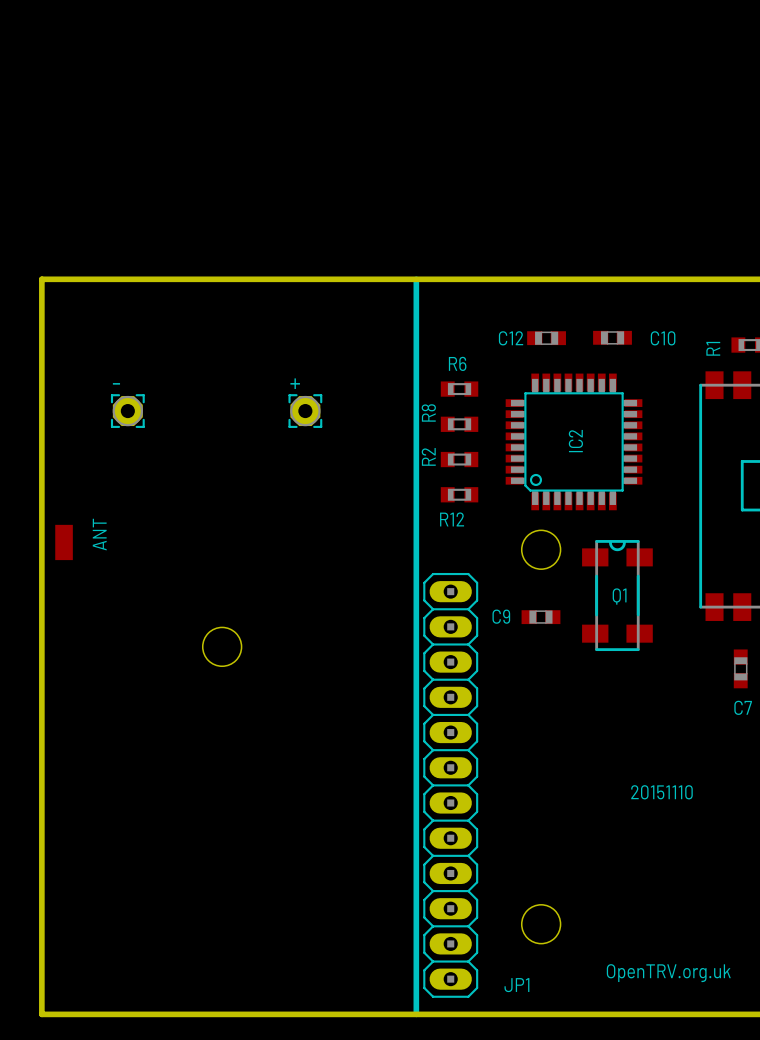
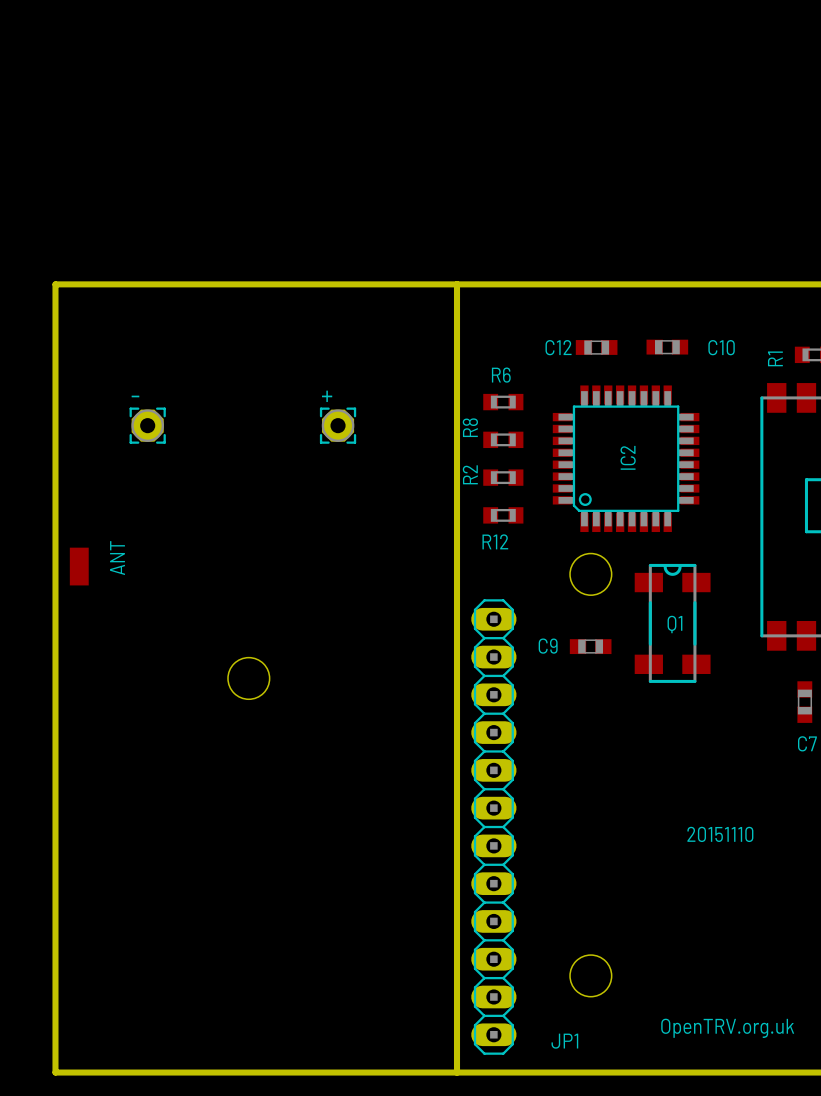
board edge: none -> (457, 284) (457, 1072)
line: (416, 279) (416, 1014) -> none
JP1 footprint: [423, 572, 479, 998] -> [471, 599, 517, 1055]

